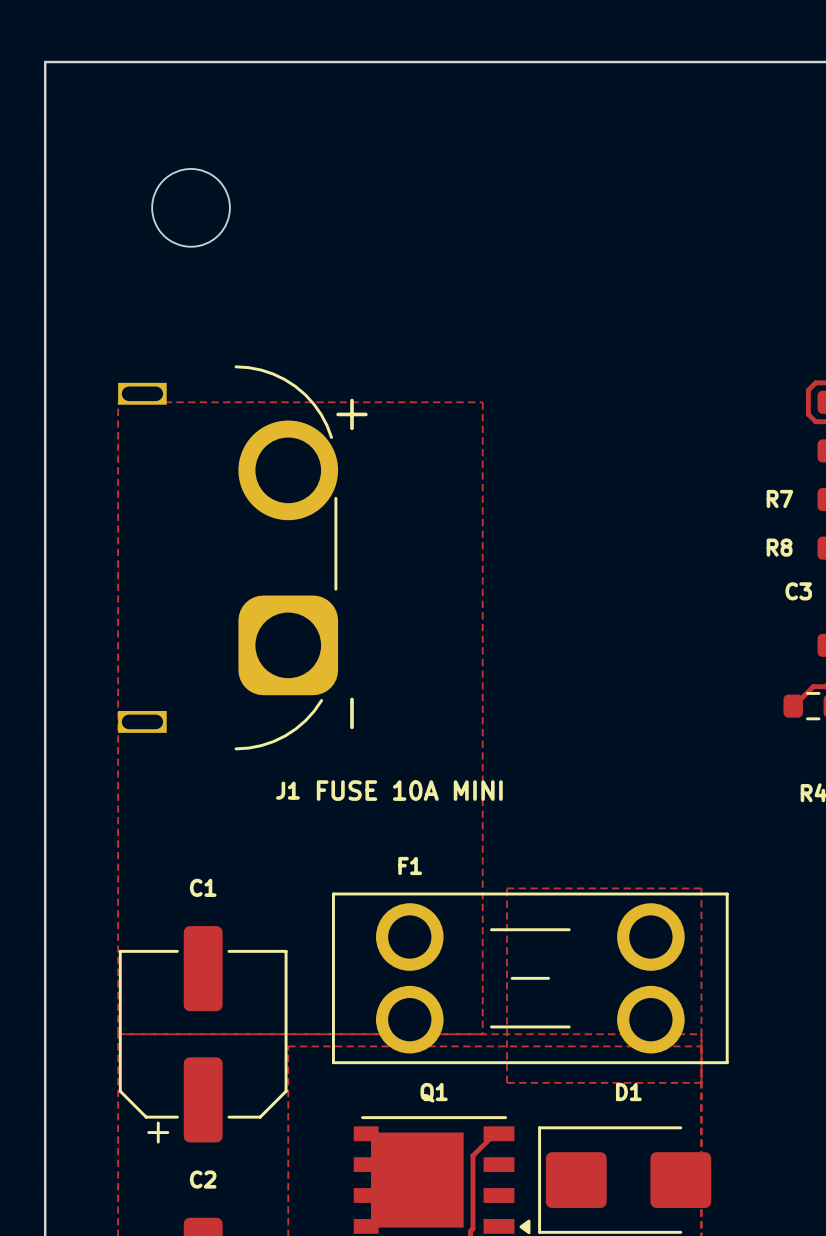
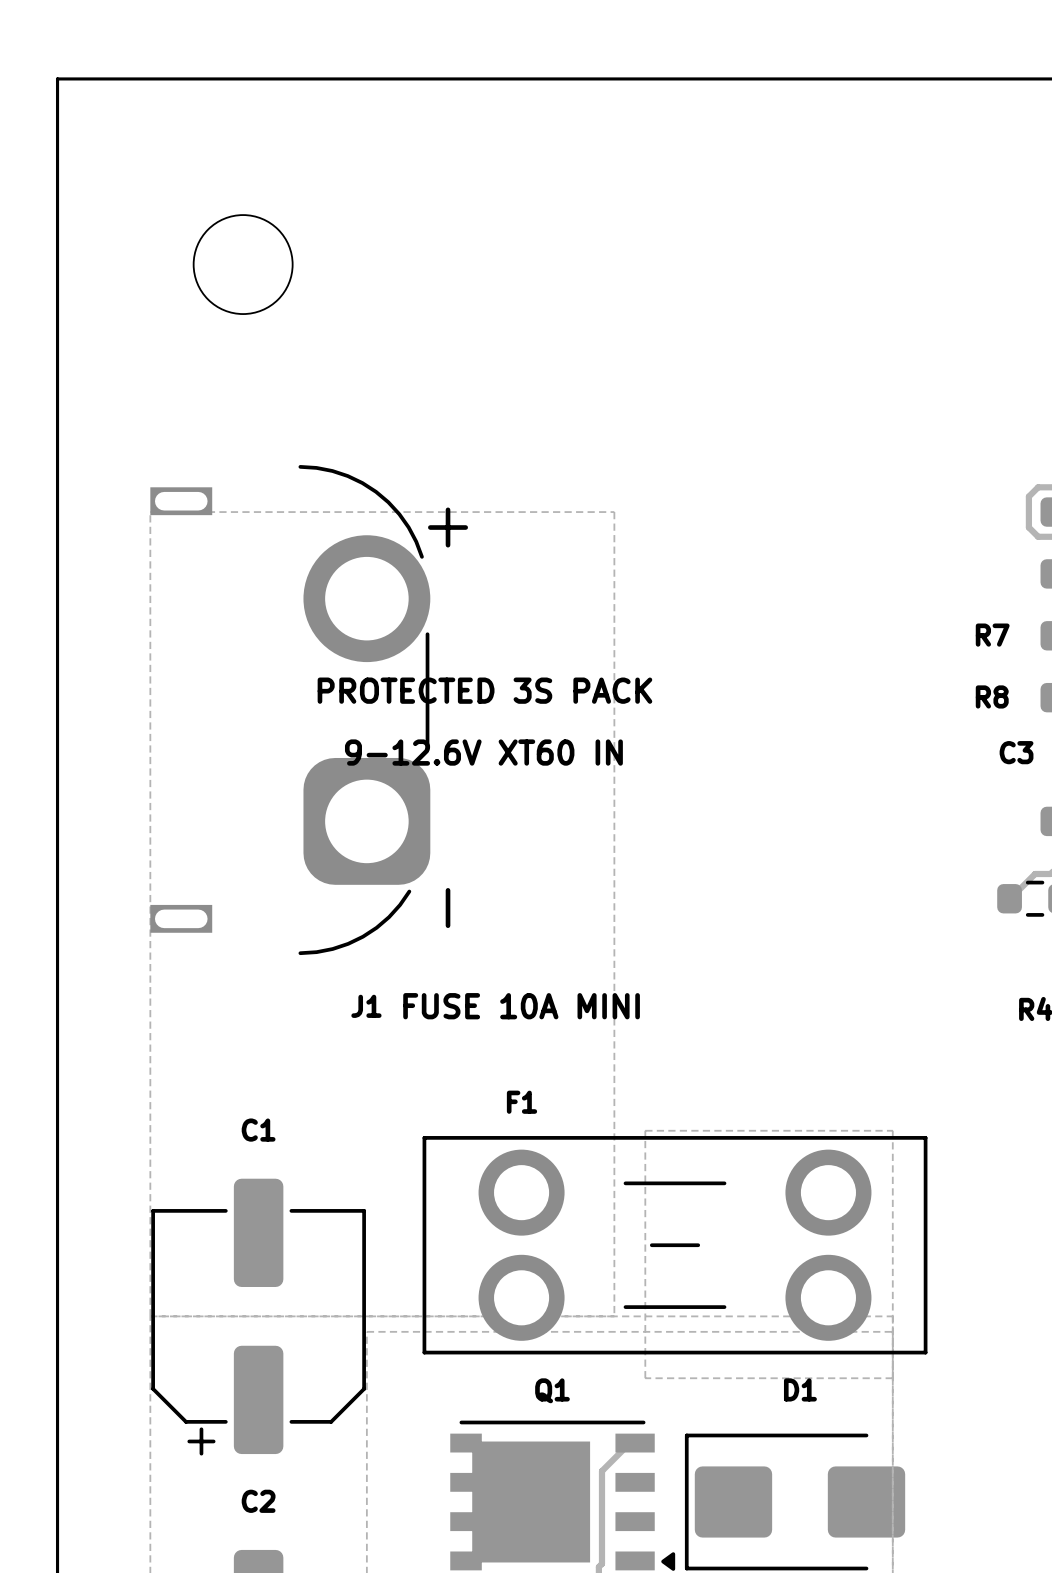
text: none -> PROTECTED 3S PACK (484, 690)
text: none -> 9-12.6V XT60 IN (483, 752)

